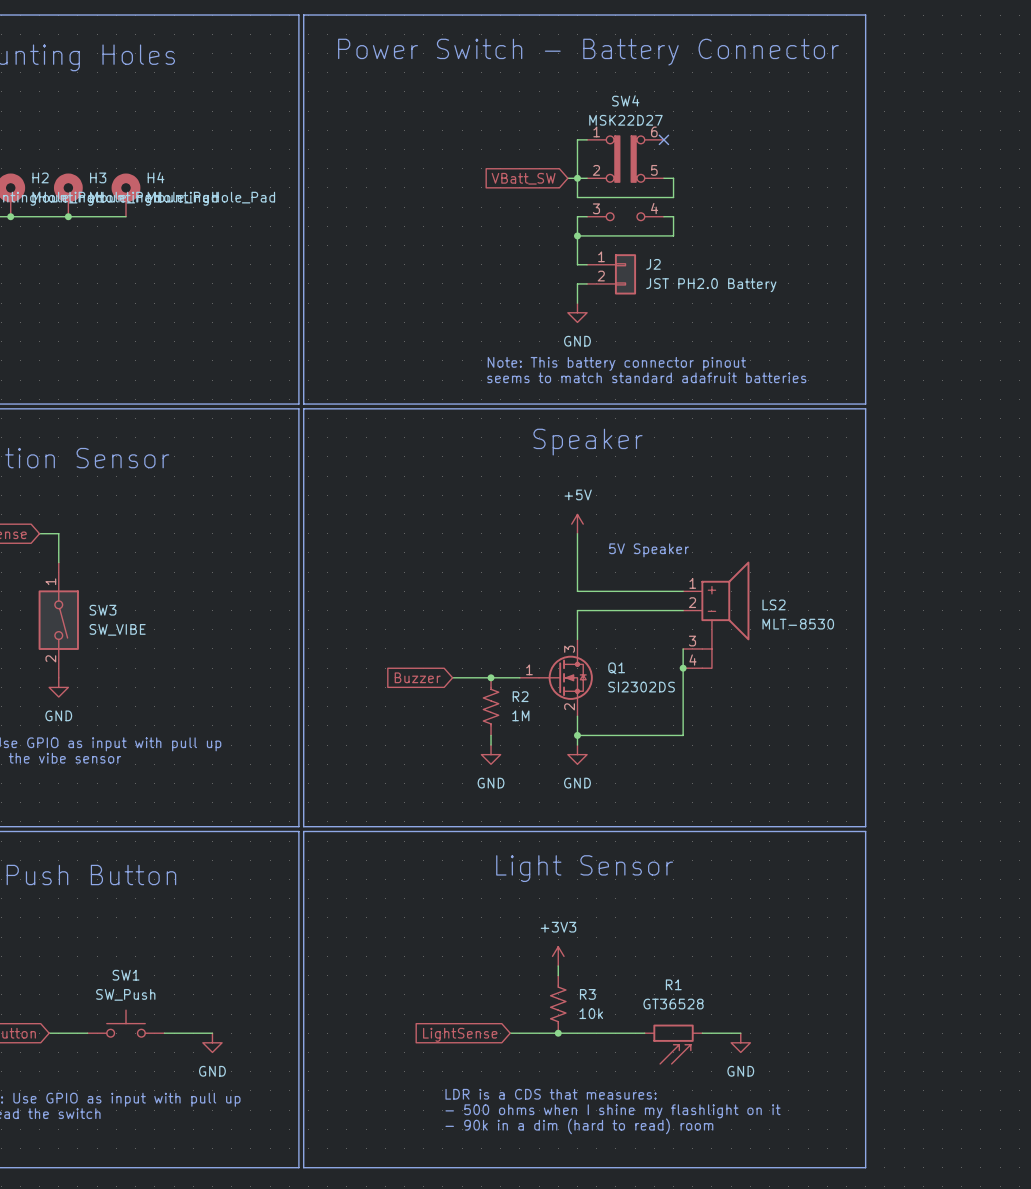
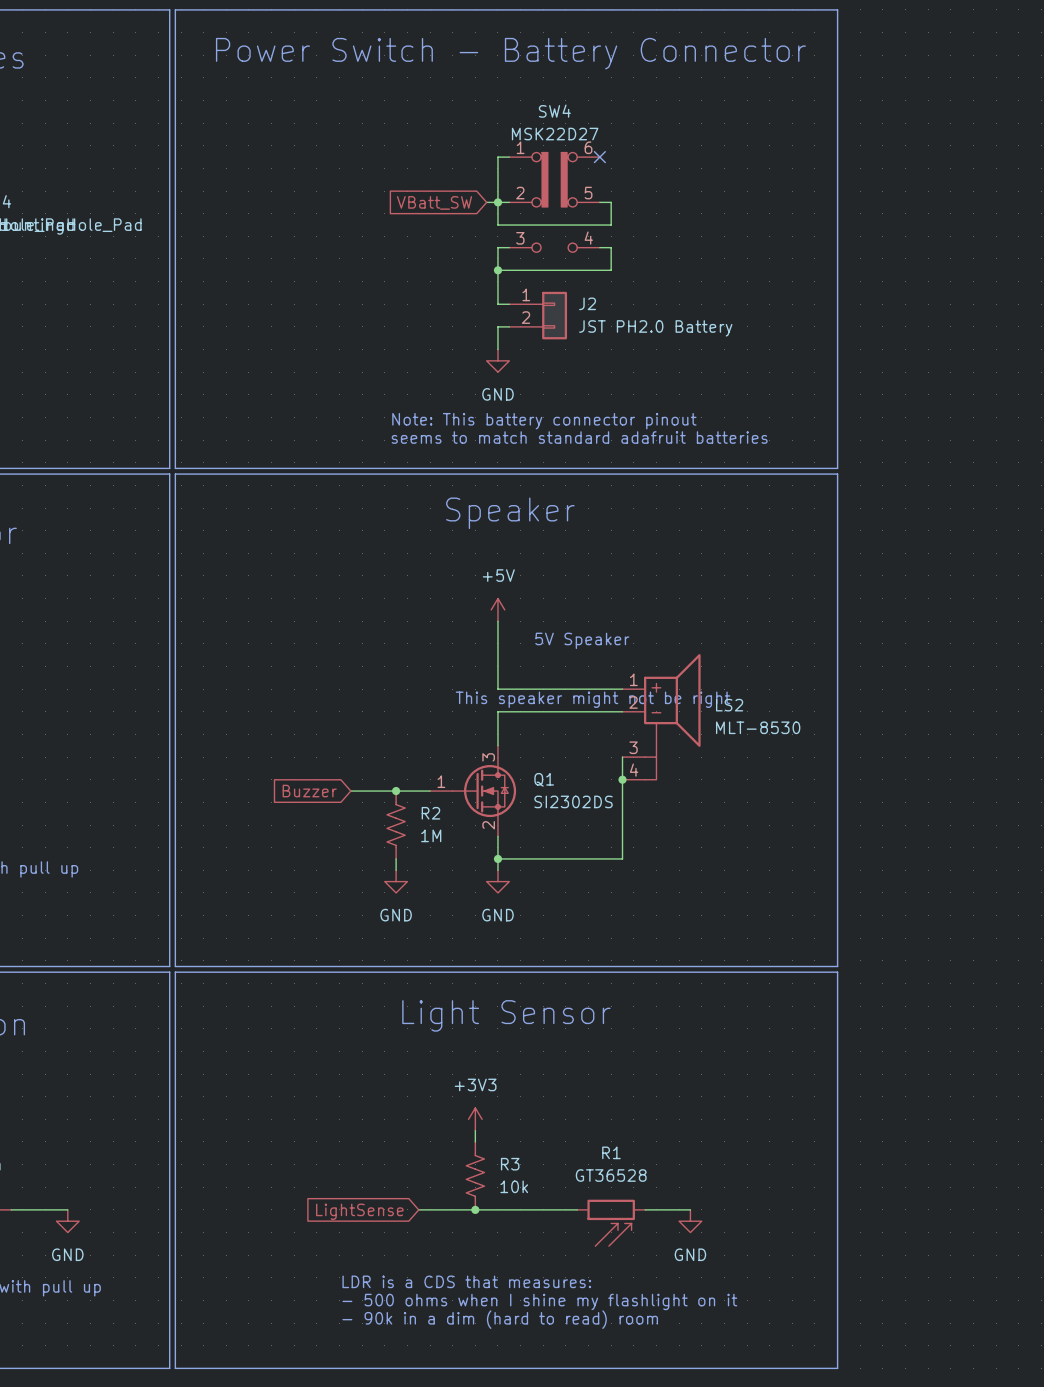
text: none -> This speaker might not be right (593, 699)

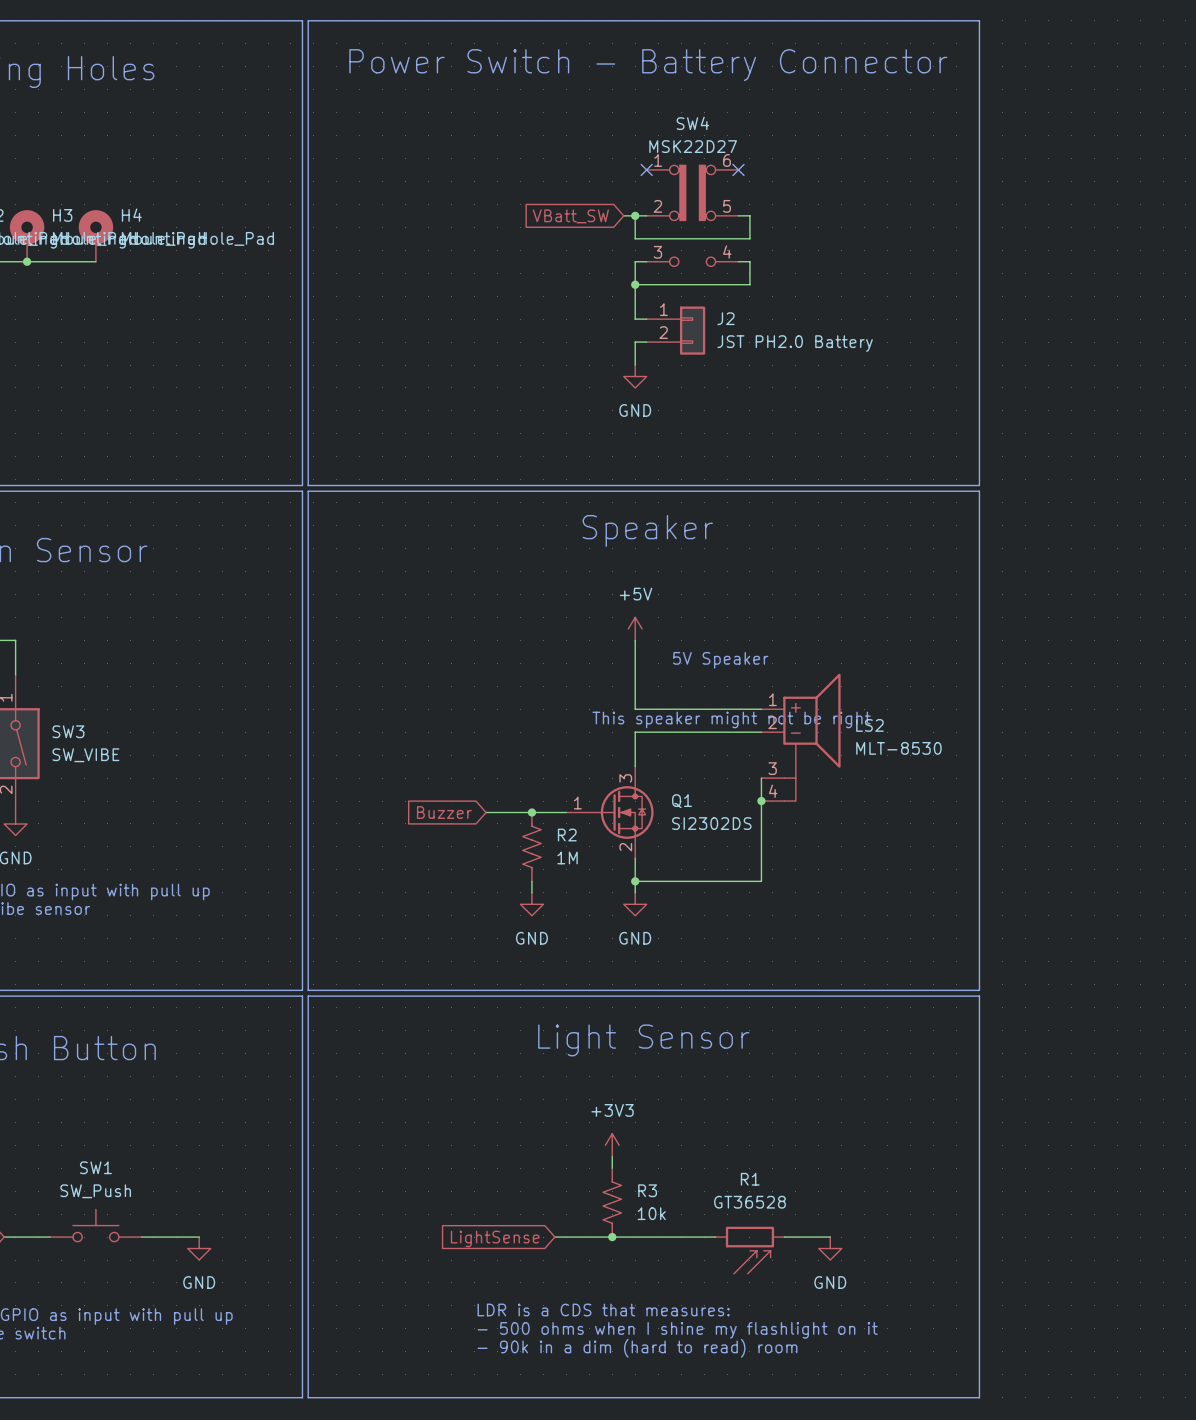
wire: (509, 157) (497, 157) (497, 202) -> none
no-connect mark: none -> (646, 169)
text: Note: This battery connector pinout (544, 421) -> none
text: seems to match standard adafruit batteries (579, 437) -> none

